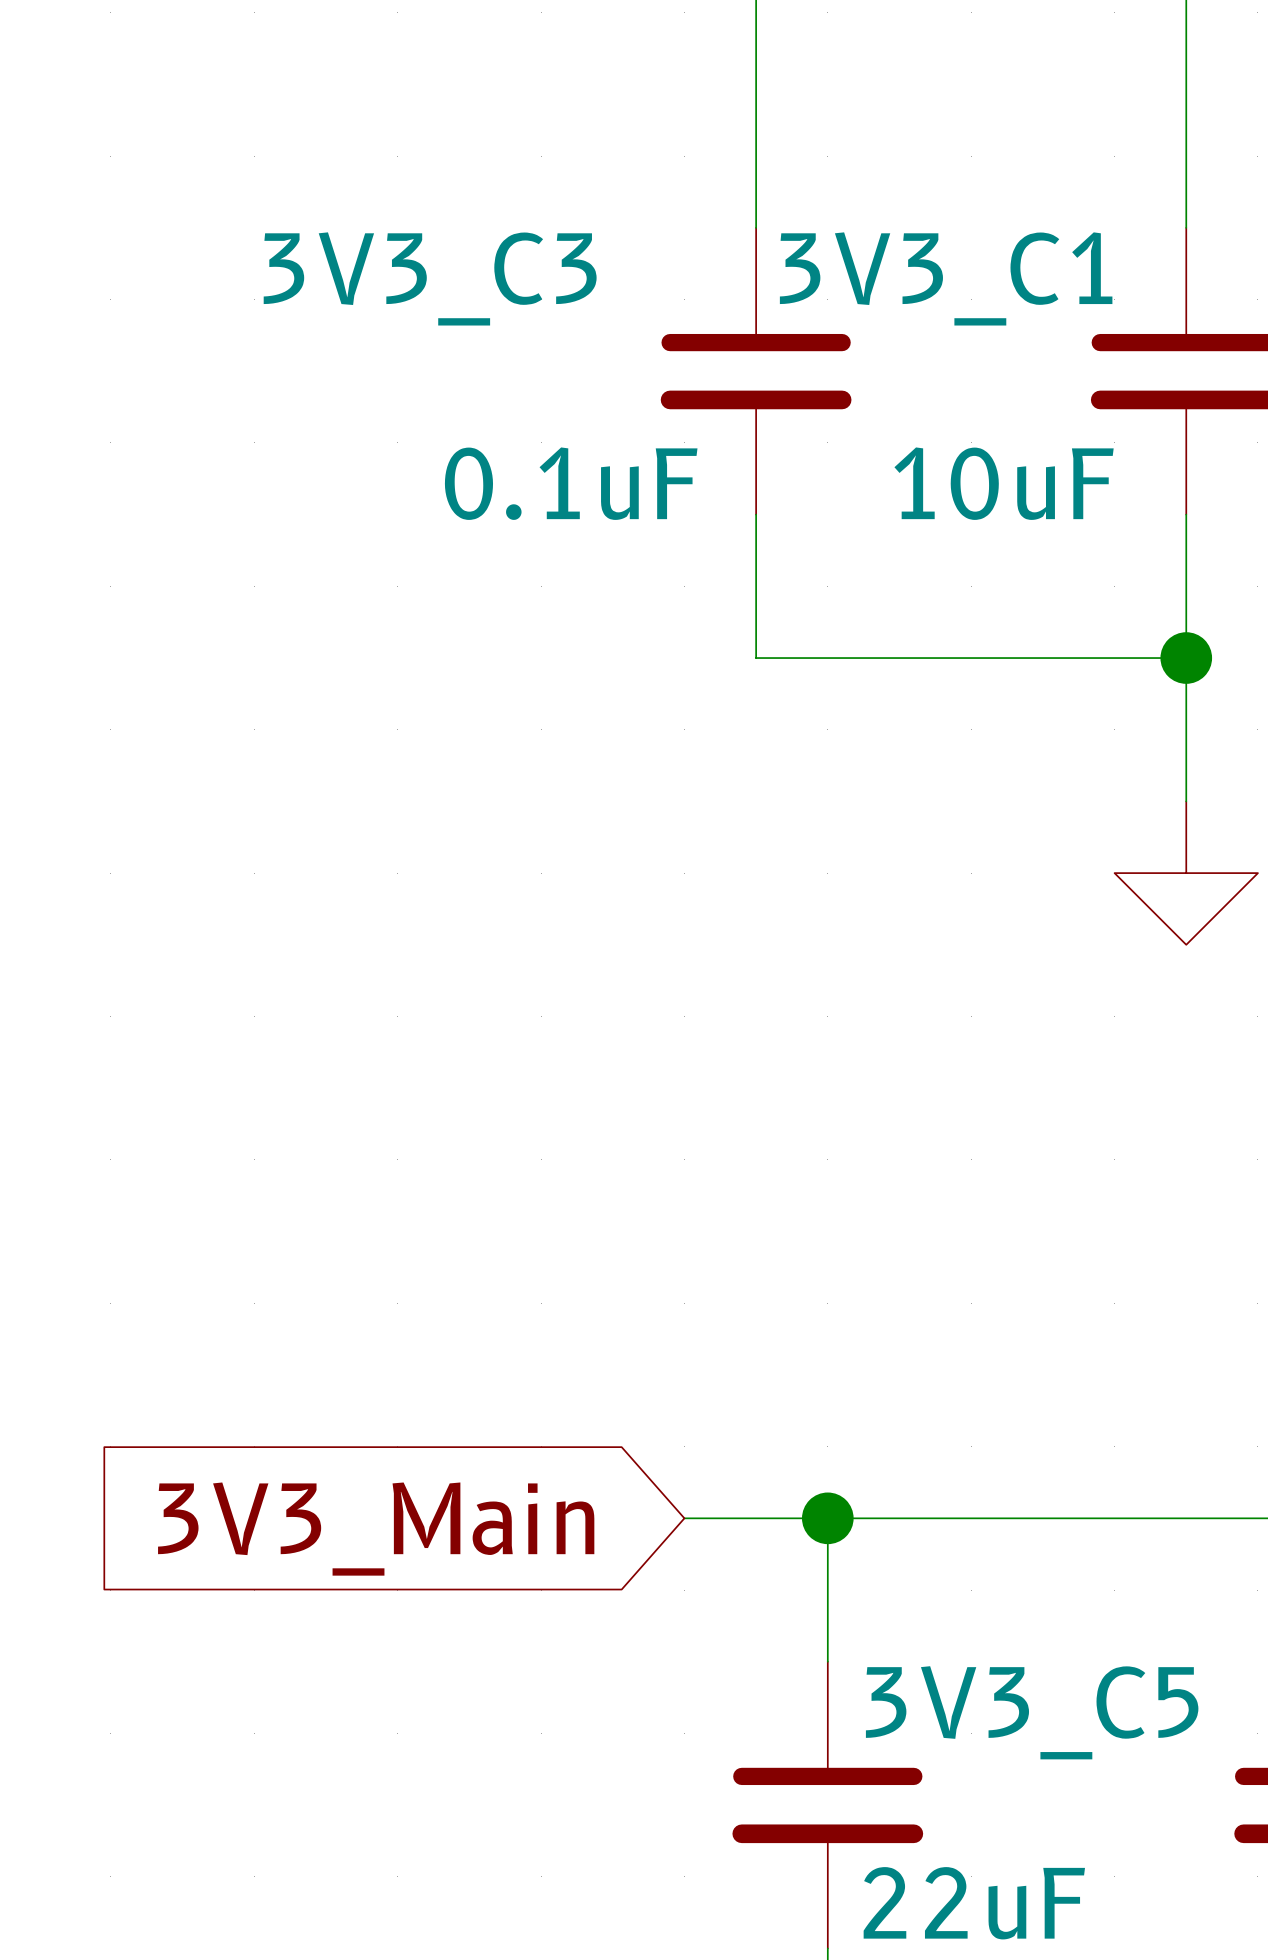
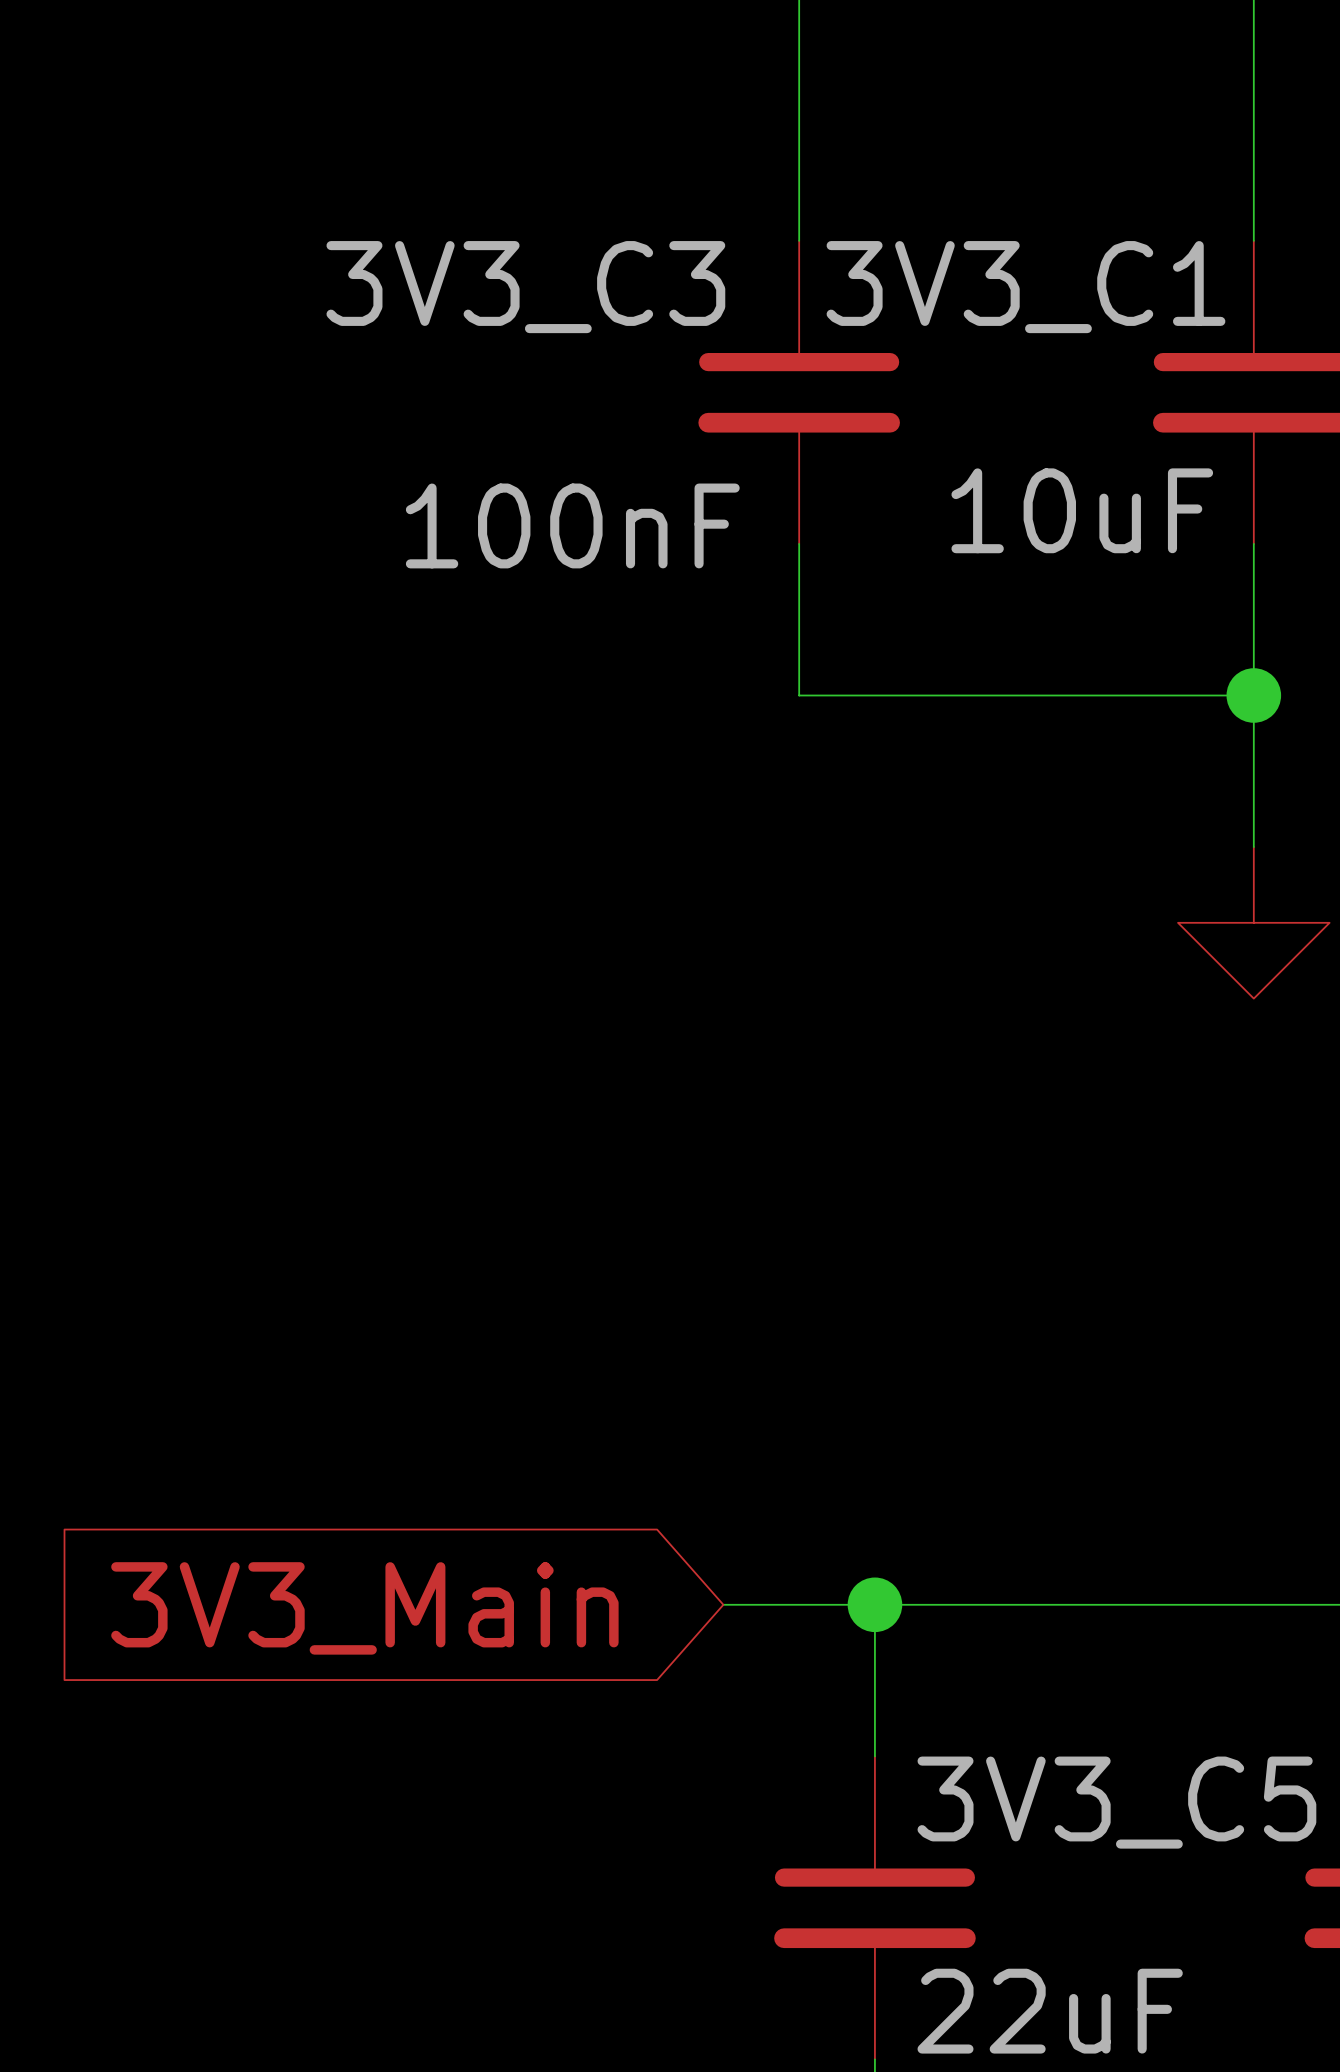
3V3_C3 name position: 3V3_C3 (430, 278) -> 3V3_C3 (525, 287)
3V3_C3 value: 0.1uF (571, 483) -> 100nF (572, 525)

